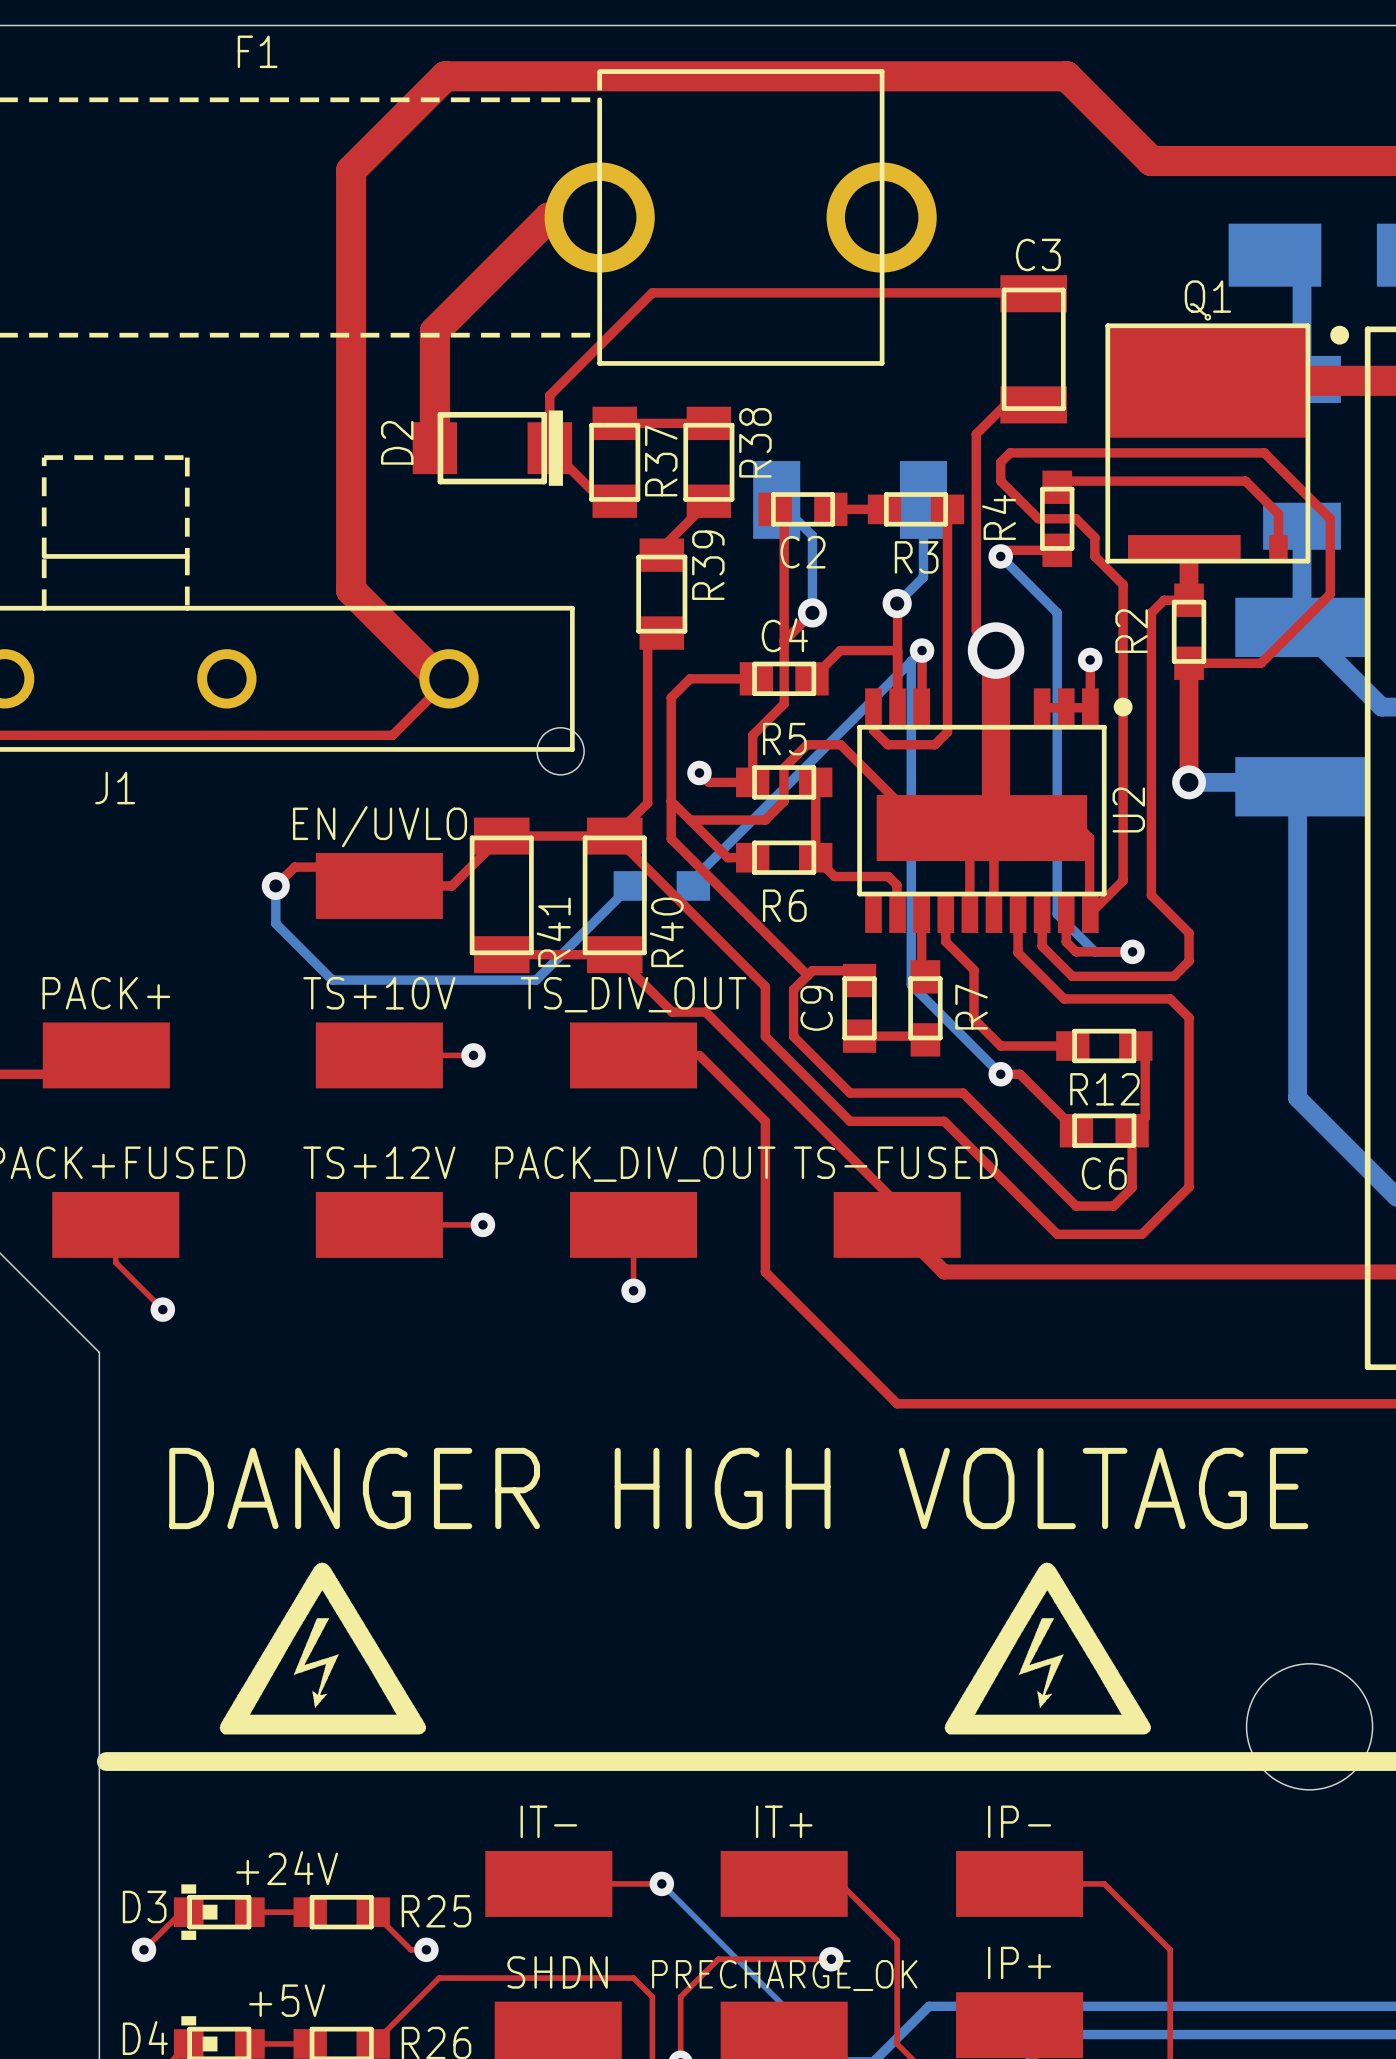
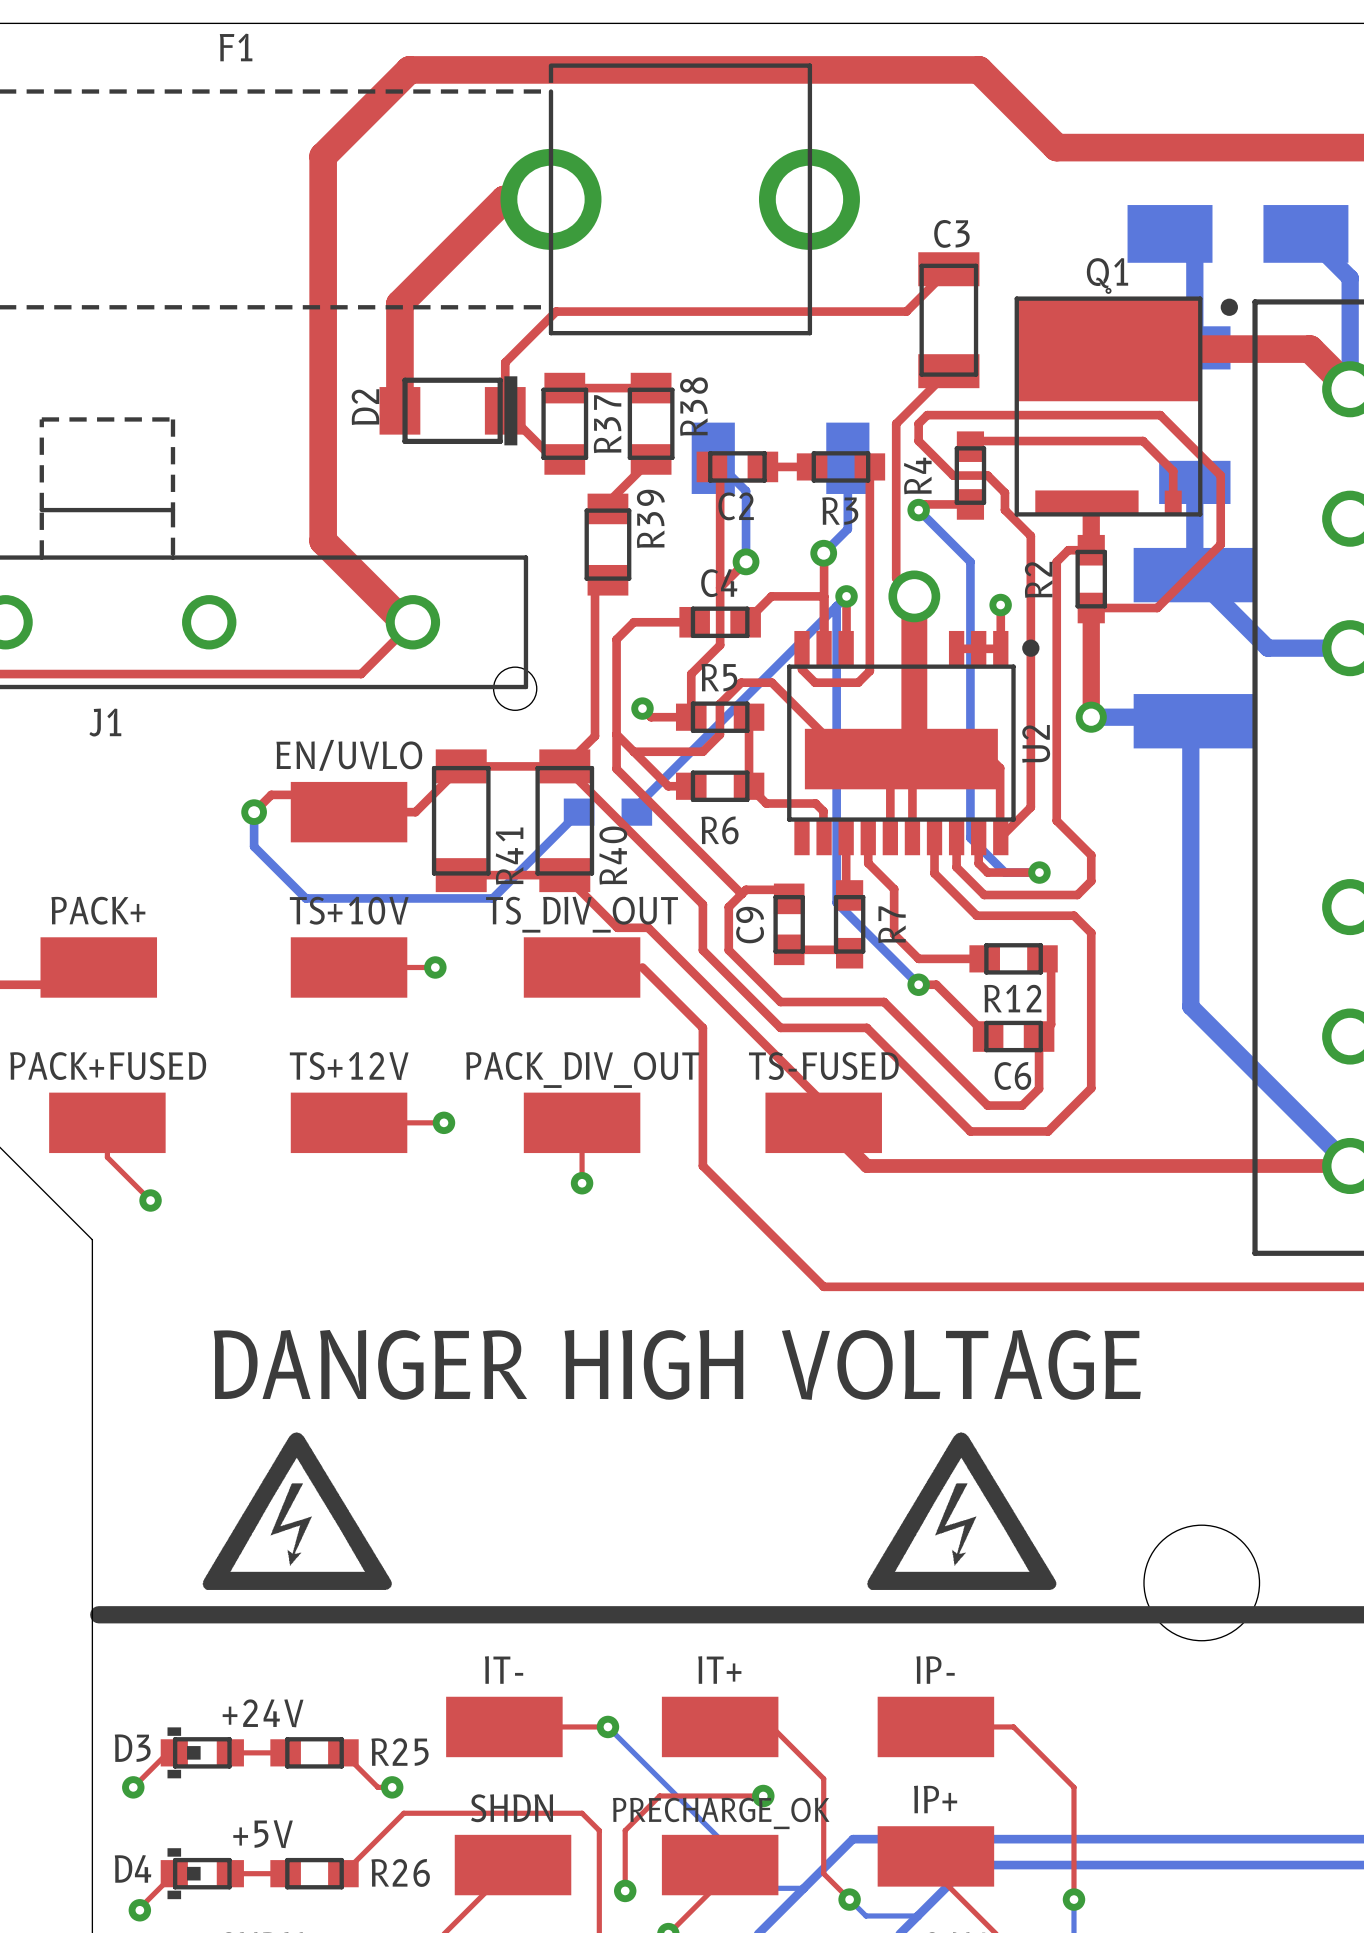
top track: (1033, 293) (652, 292) (605, 339) -> (948, 269) (906, 311) (556, 311)
top track: (1033, 404) (1005, 404) (976, 434) (976, 462) -> (948, 371) (896, 423)

